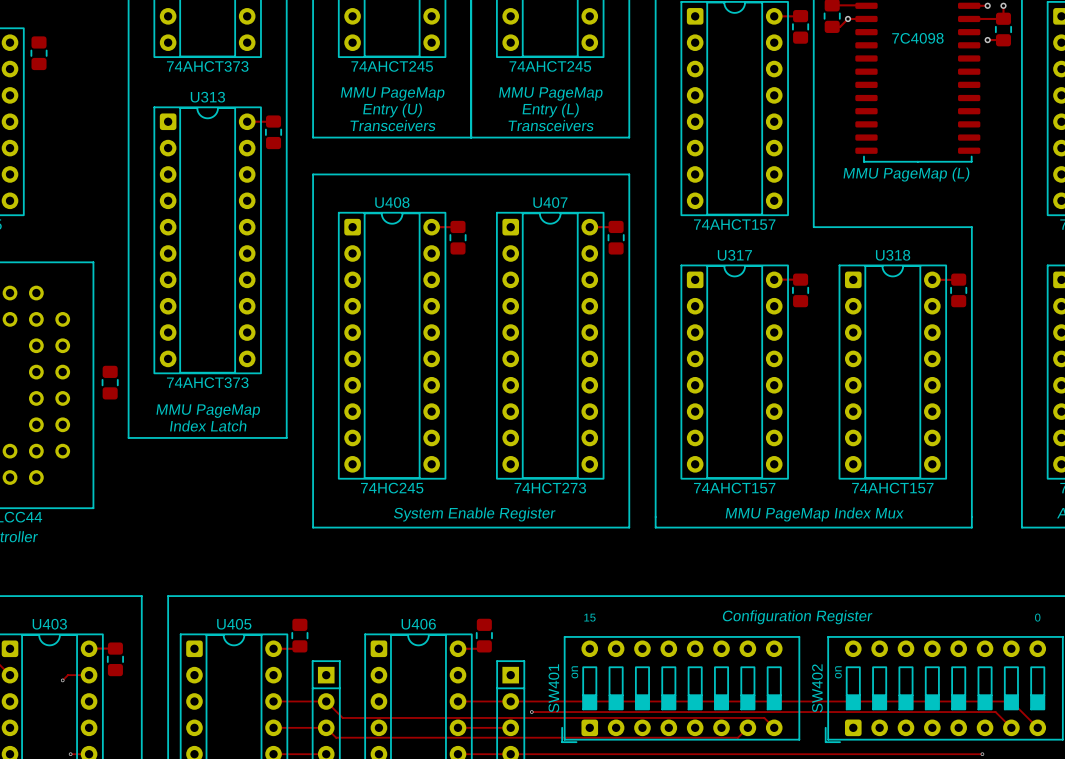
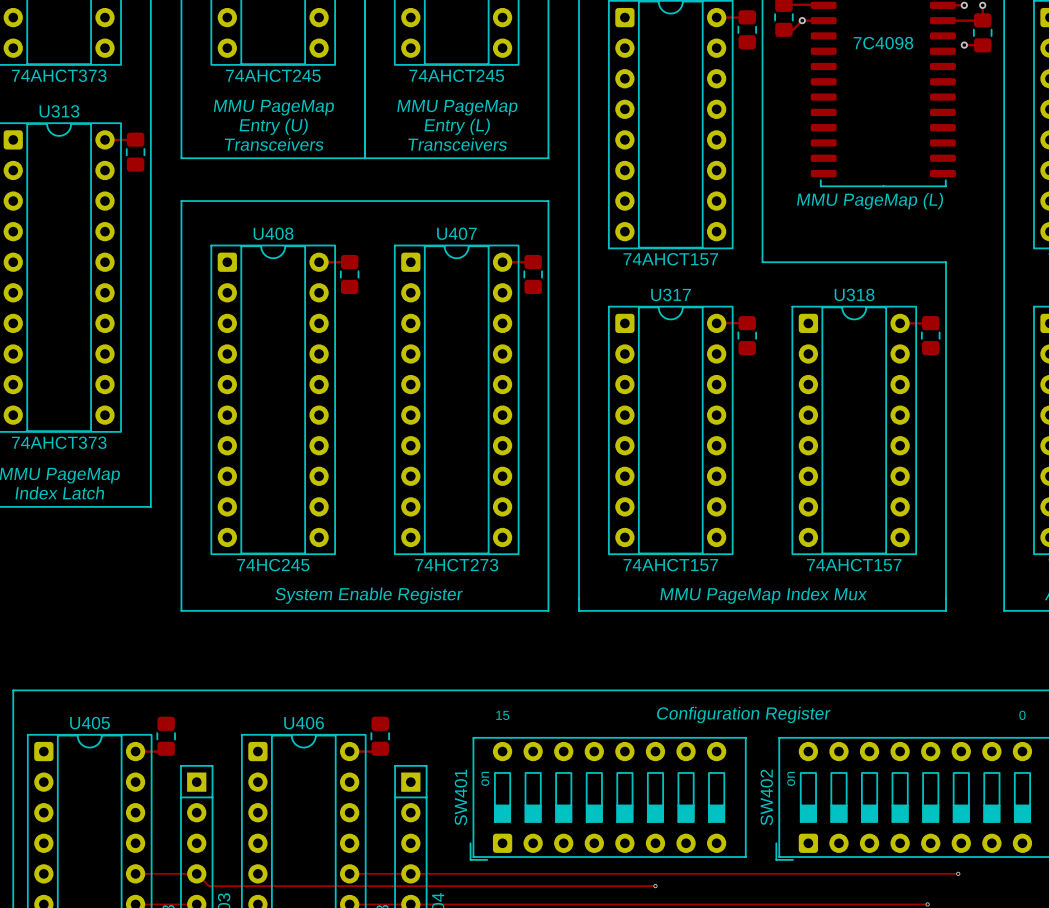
track: (273, 701) (326, 701) (342, 717) (764, 717) (774, 727) -> none
track: (458, 701) (1011, 701) (1037, 727) -> none
track: (531, 712) (995, 712) (1011, 727) -> none
via: (531, 712) -> none
track: (273, 727) (326, 727) (336, 737) (738, 737) (747, 727) -> none
track: (458, 727) (510, 727) -> none

